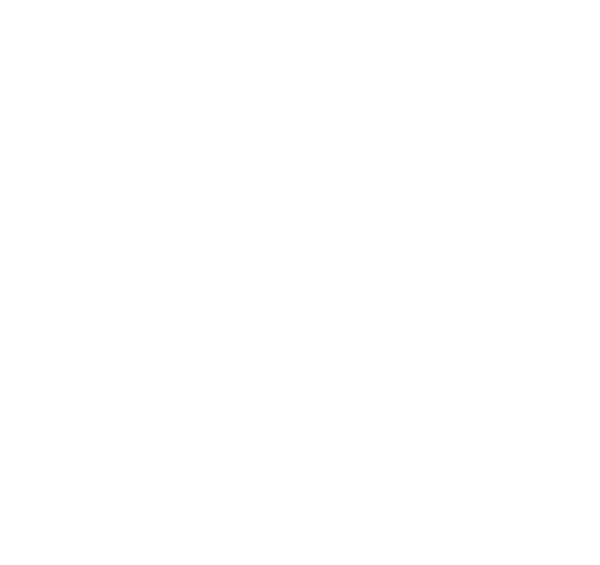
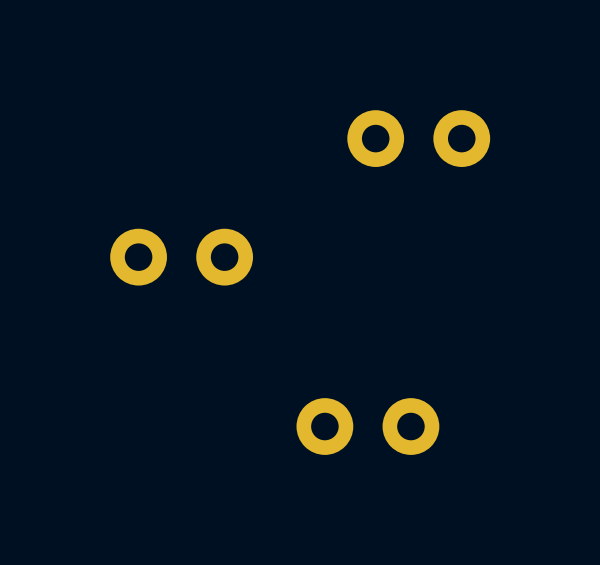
part: none -> (418, 138)
part: none -> (181, 257)
part: none -> (367, 426)

